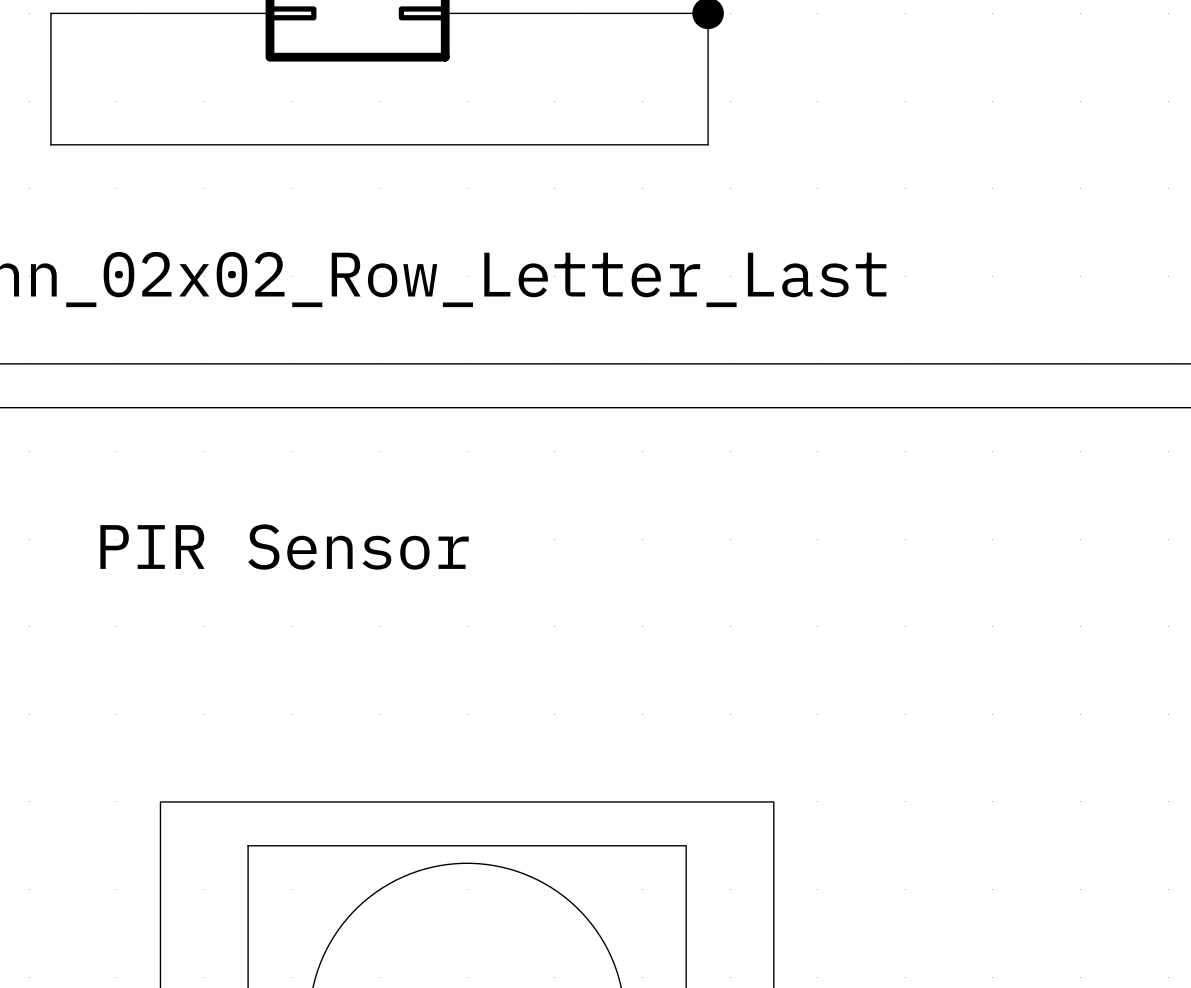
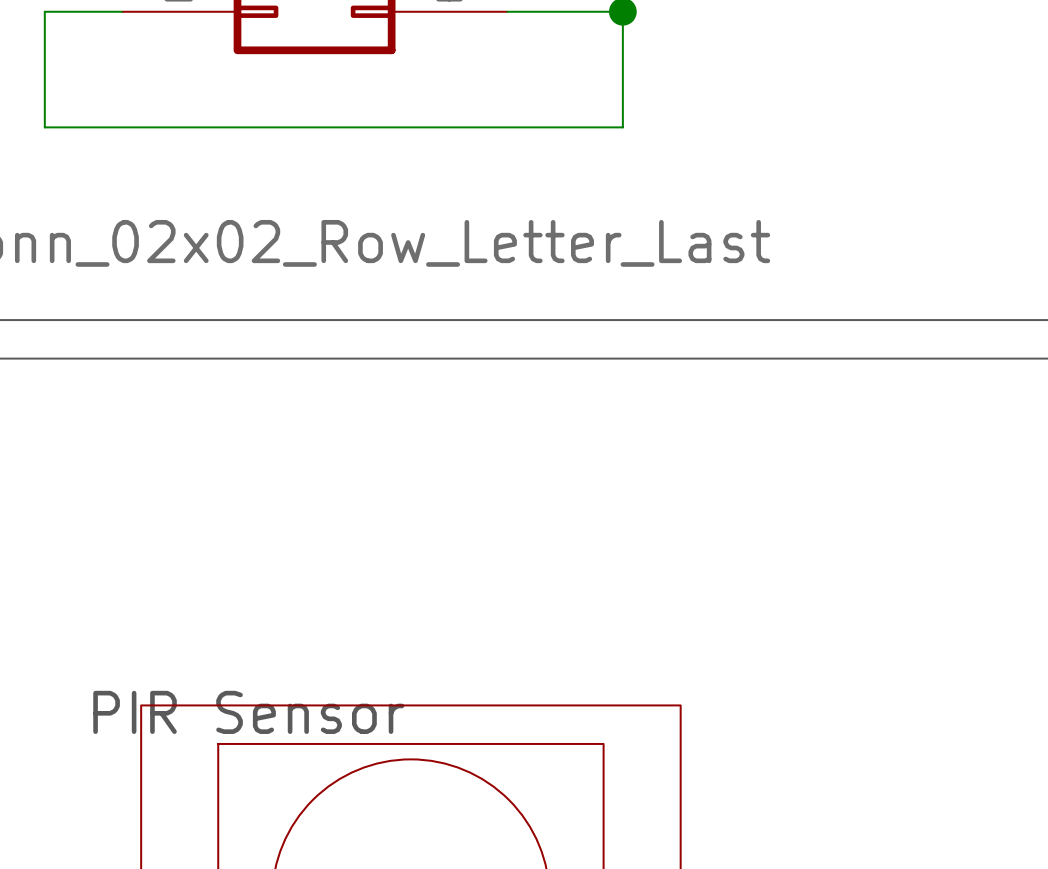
text position: PIR Sensor (284, 547) -> PIR Sensor (248, 712)

